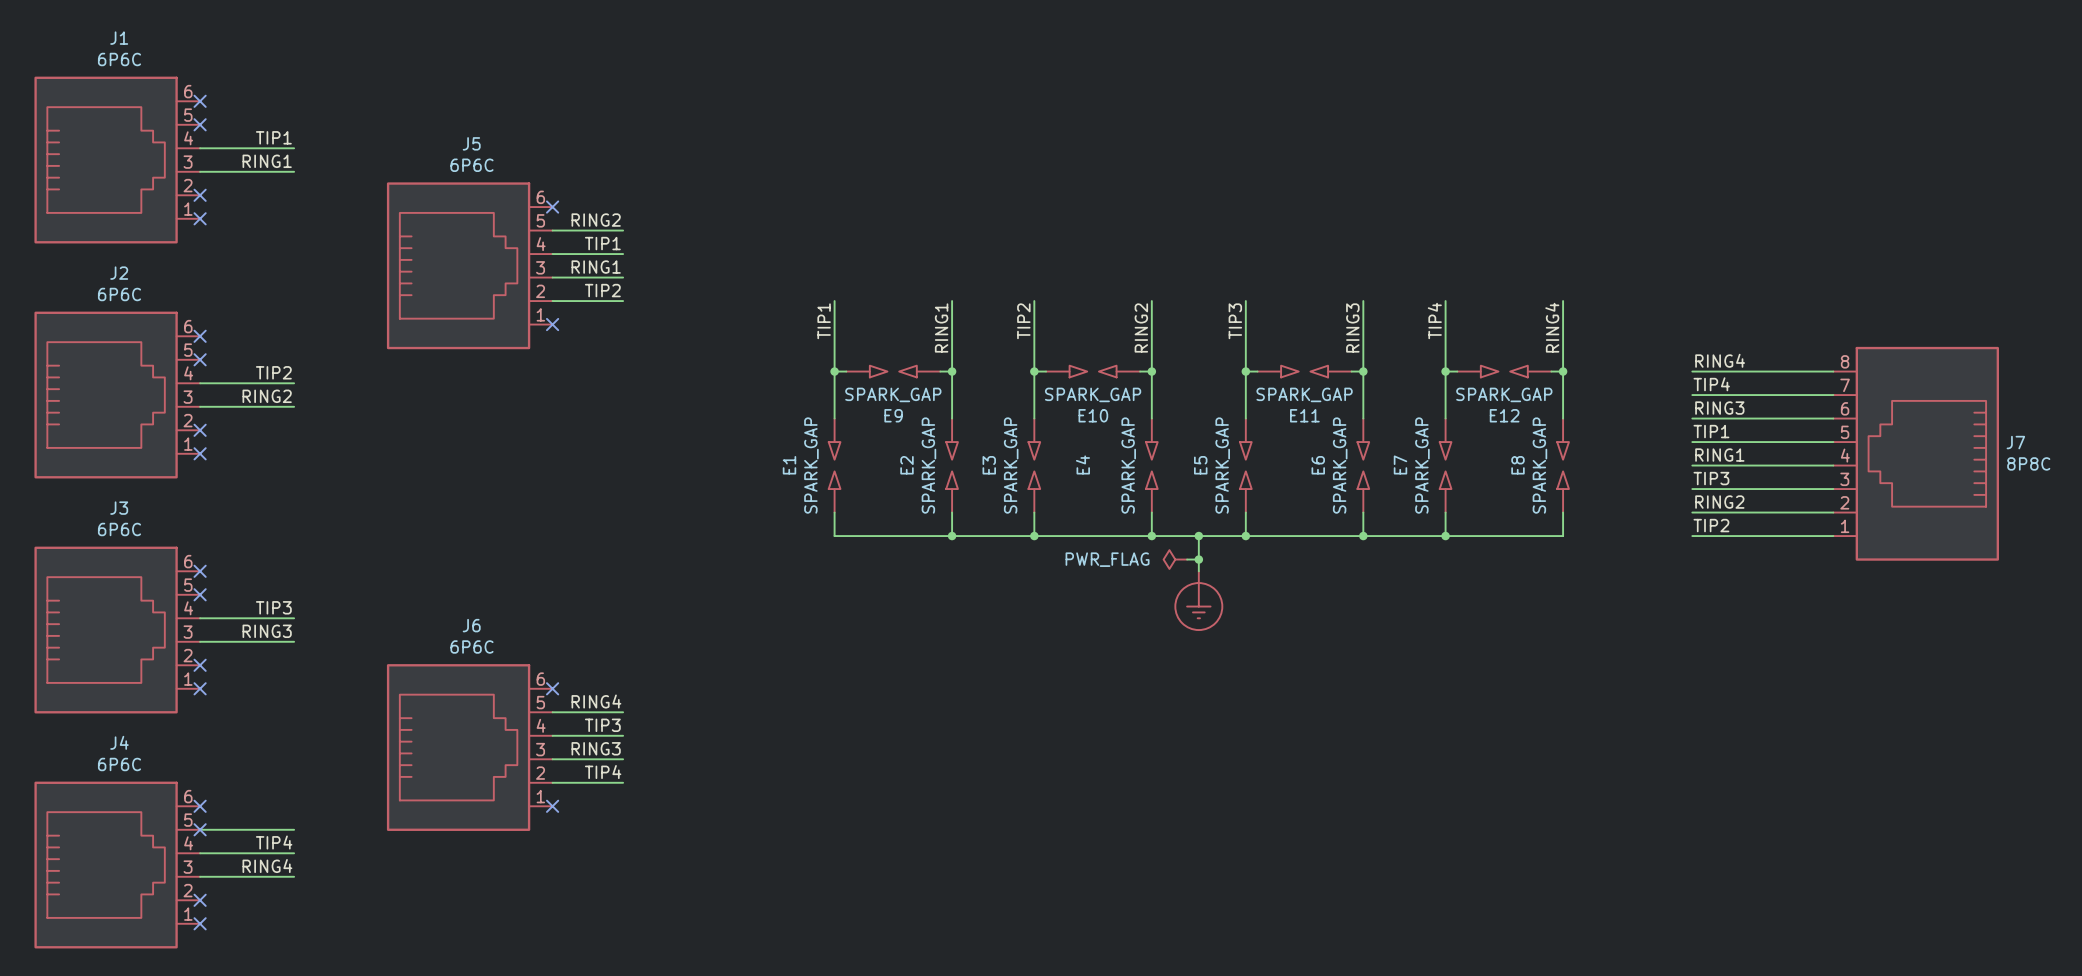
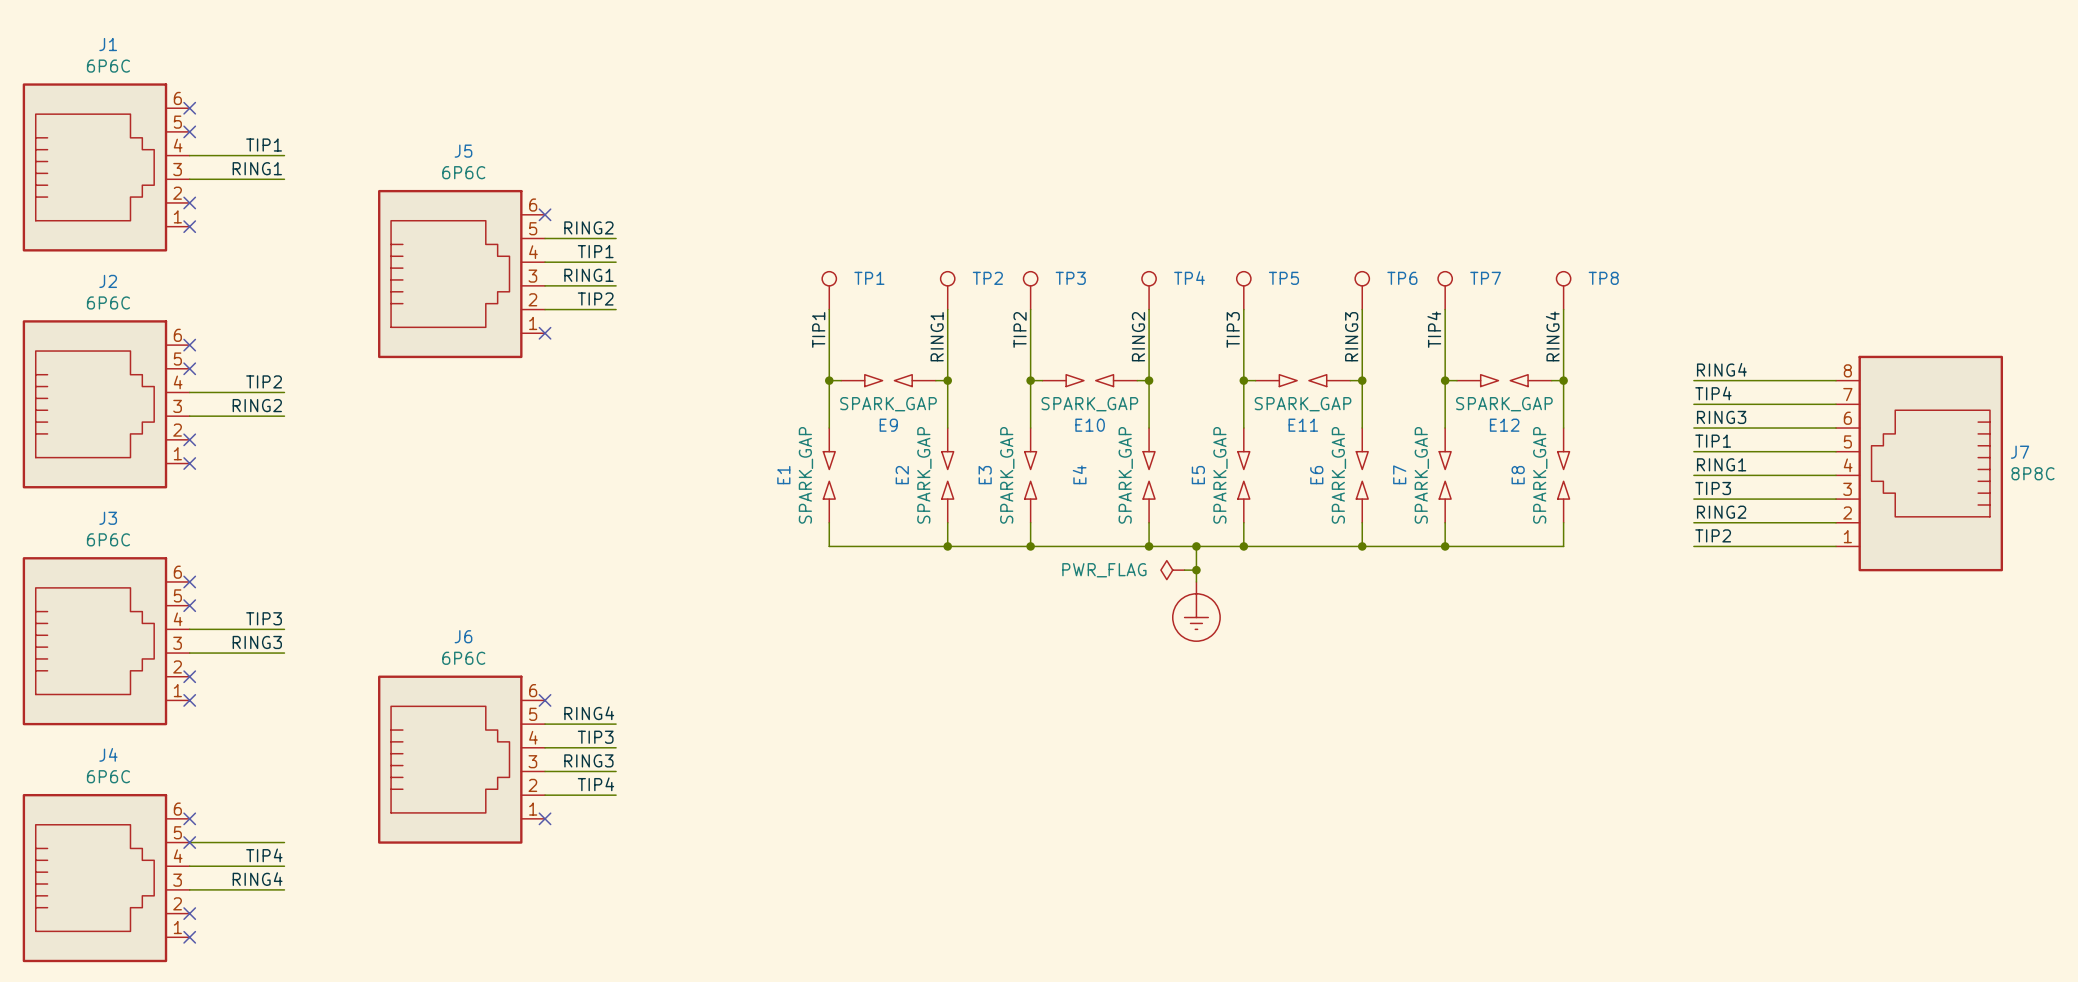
TP1: none -> (829, 290)
TP2: none -> (947, 290)
TP3: none -> (1030, 290)
TP4: none -> (1149, 290)
TP5: none -> (1243, 290)
TP6: none -> (1362, 290)
TP7: none -> (1445, 290)
TP8: none -> (1563, 290)

